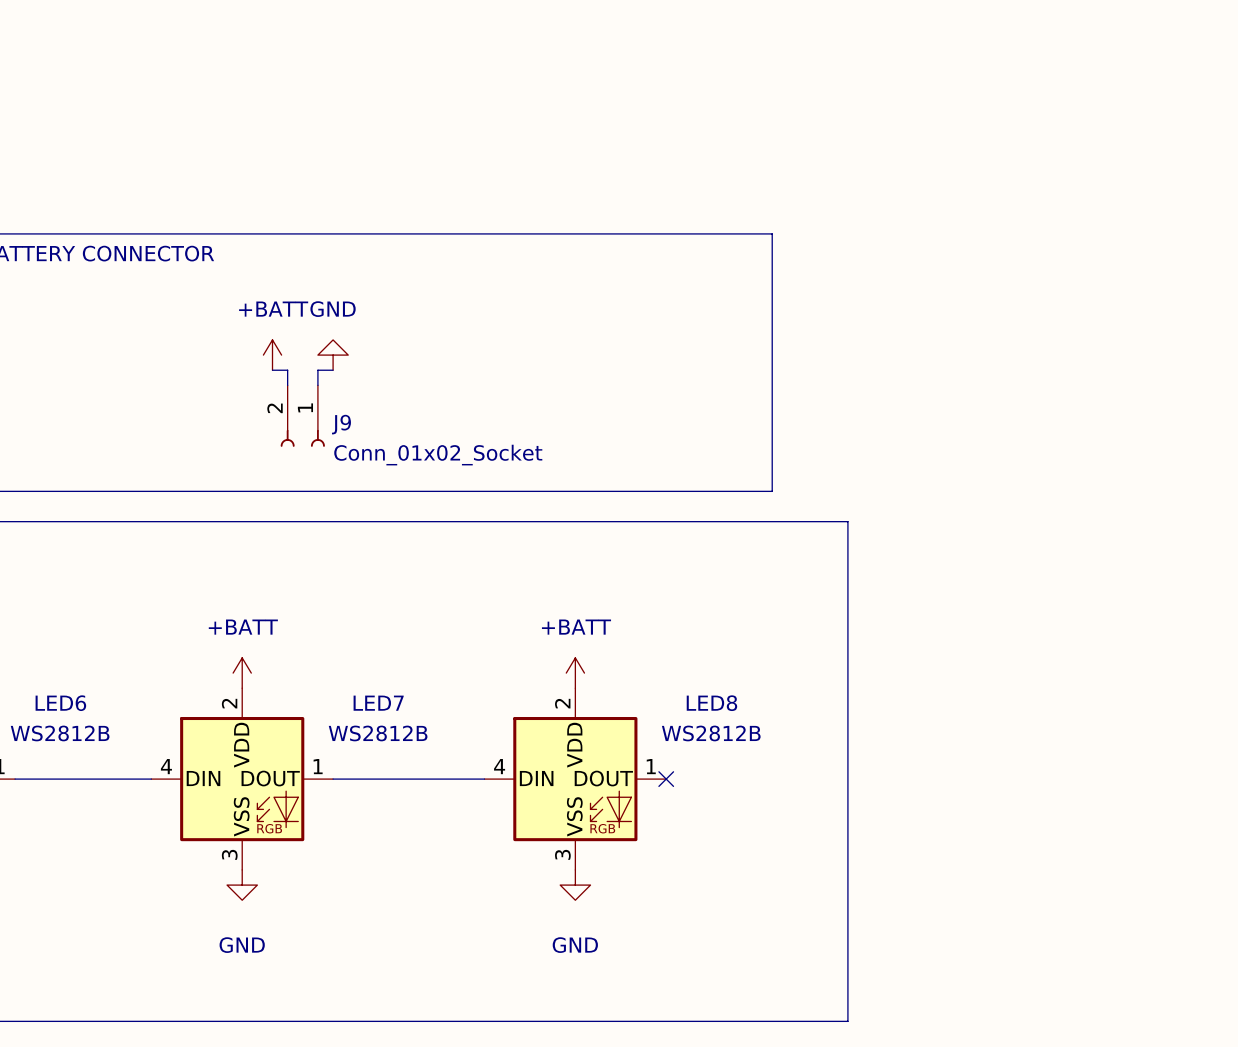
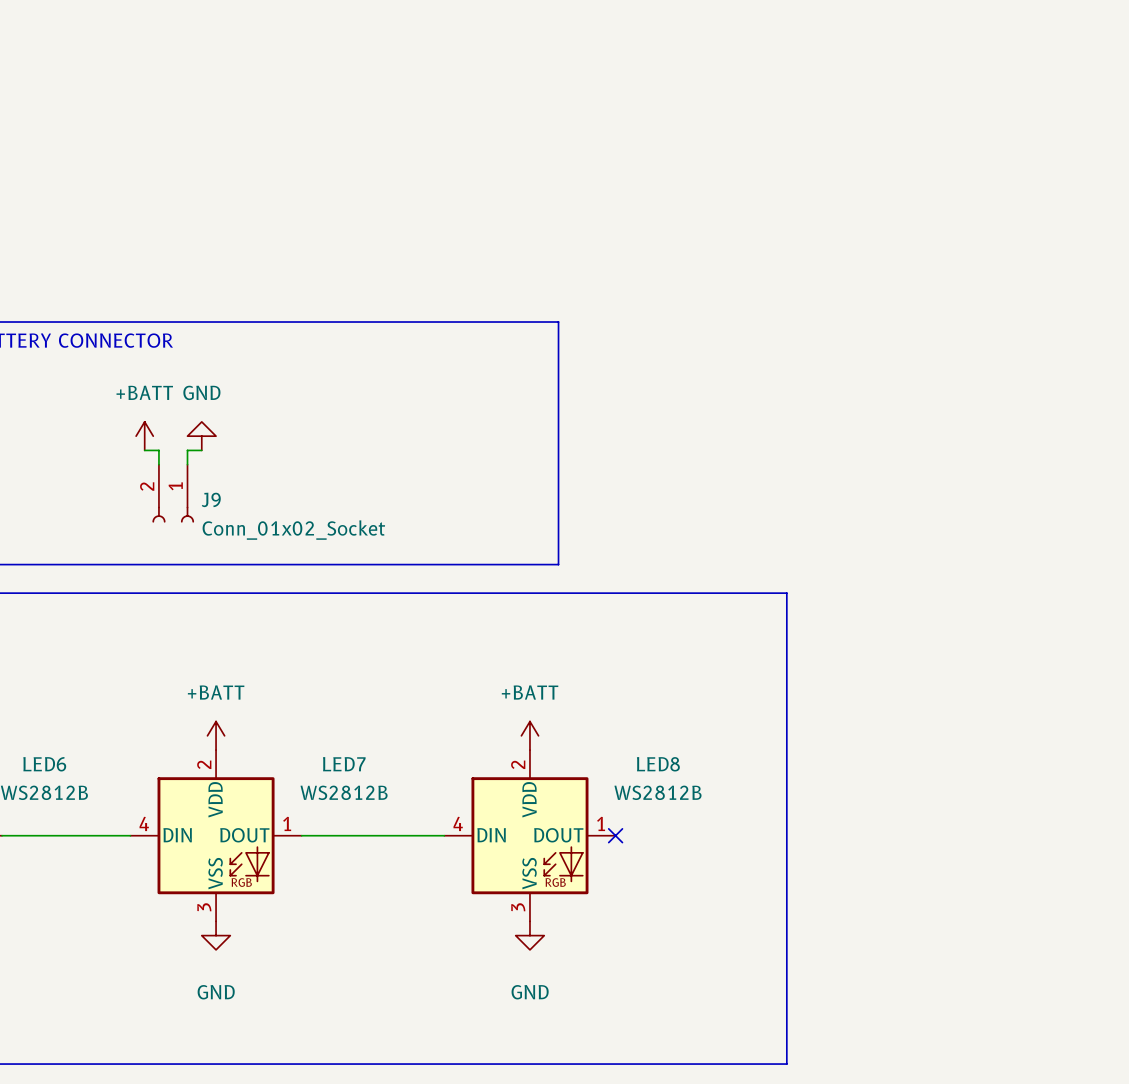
line: (605, 233) (772, 233) (772, 491) (605, 491) -> (558, 322) (558, 564)
power symbol position: +BATT (272, 355) -> +BATT (144, 436)
power symbol position: GND (333, 355) -> GND (201, 436)
wire: (272, 370) (287, 370) (287, 385) -> (144, 450) (158, 450) (158, 464)
wire: (333, 370) (317, 370) (317, 385) -> (201, 450) (187, 450) (187, 464)
J9 position: (302, 416) -> (173, 493)

